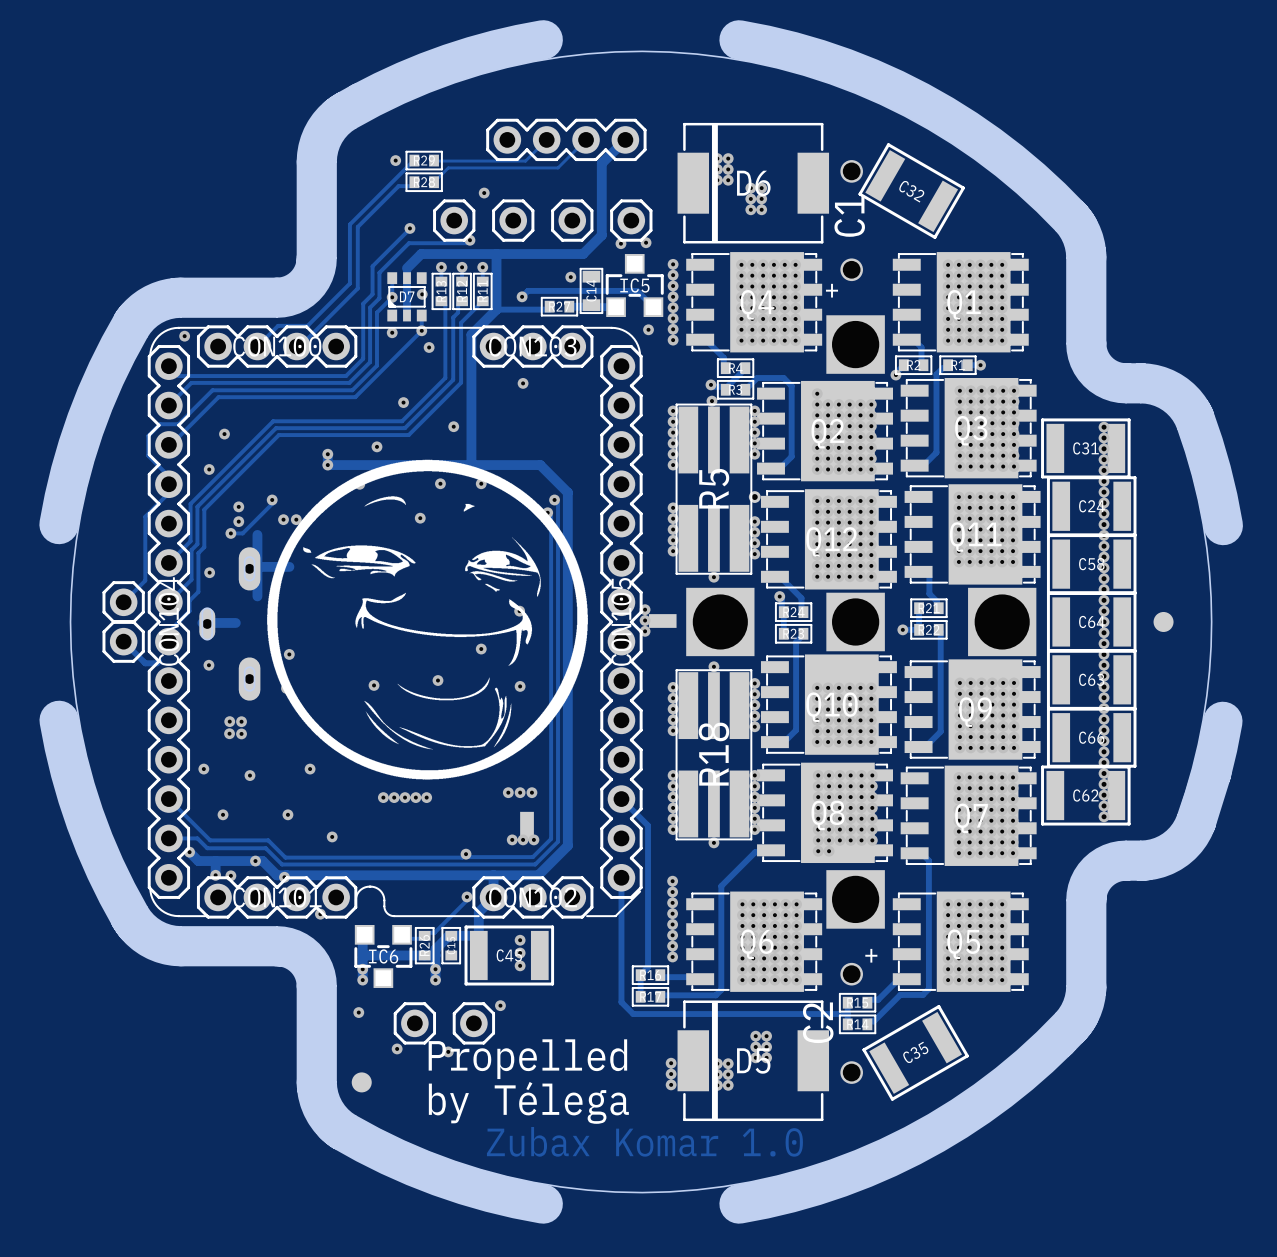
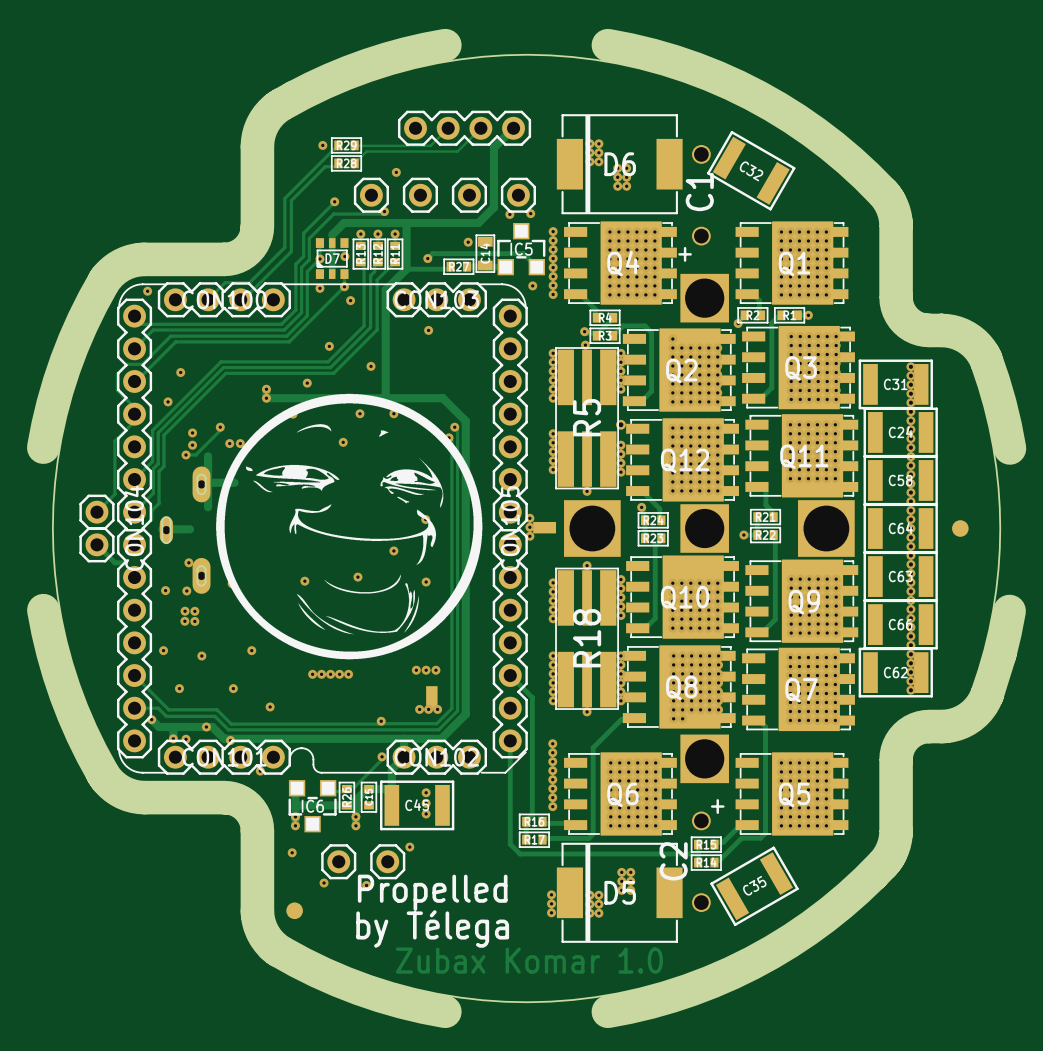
via: (209, 572) -> none
via: (289, 654) -> none
via: none -> (188, 562)
via: (208, 665) -> none
via: none -> (165, 590)
via: none -> (186, 590)

